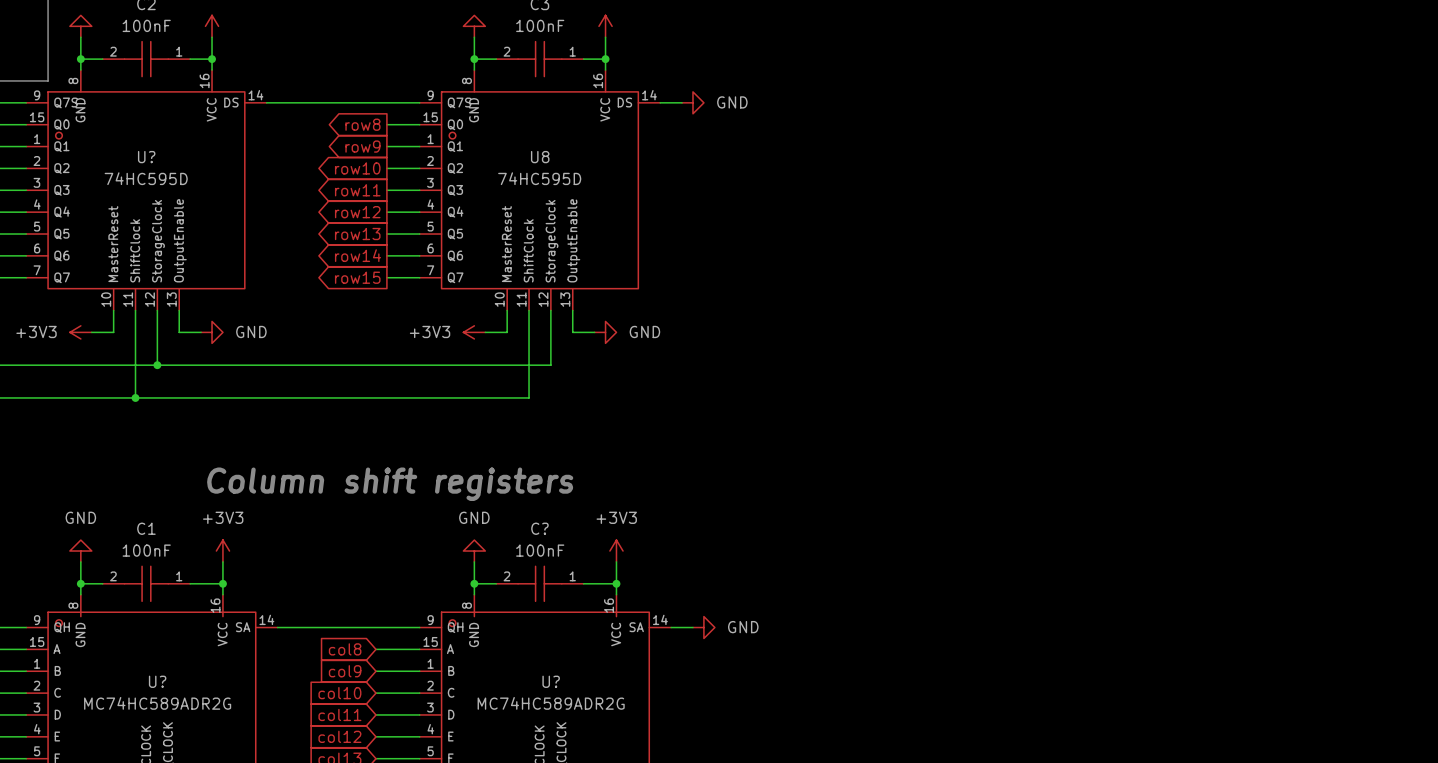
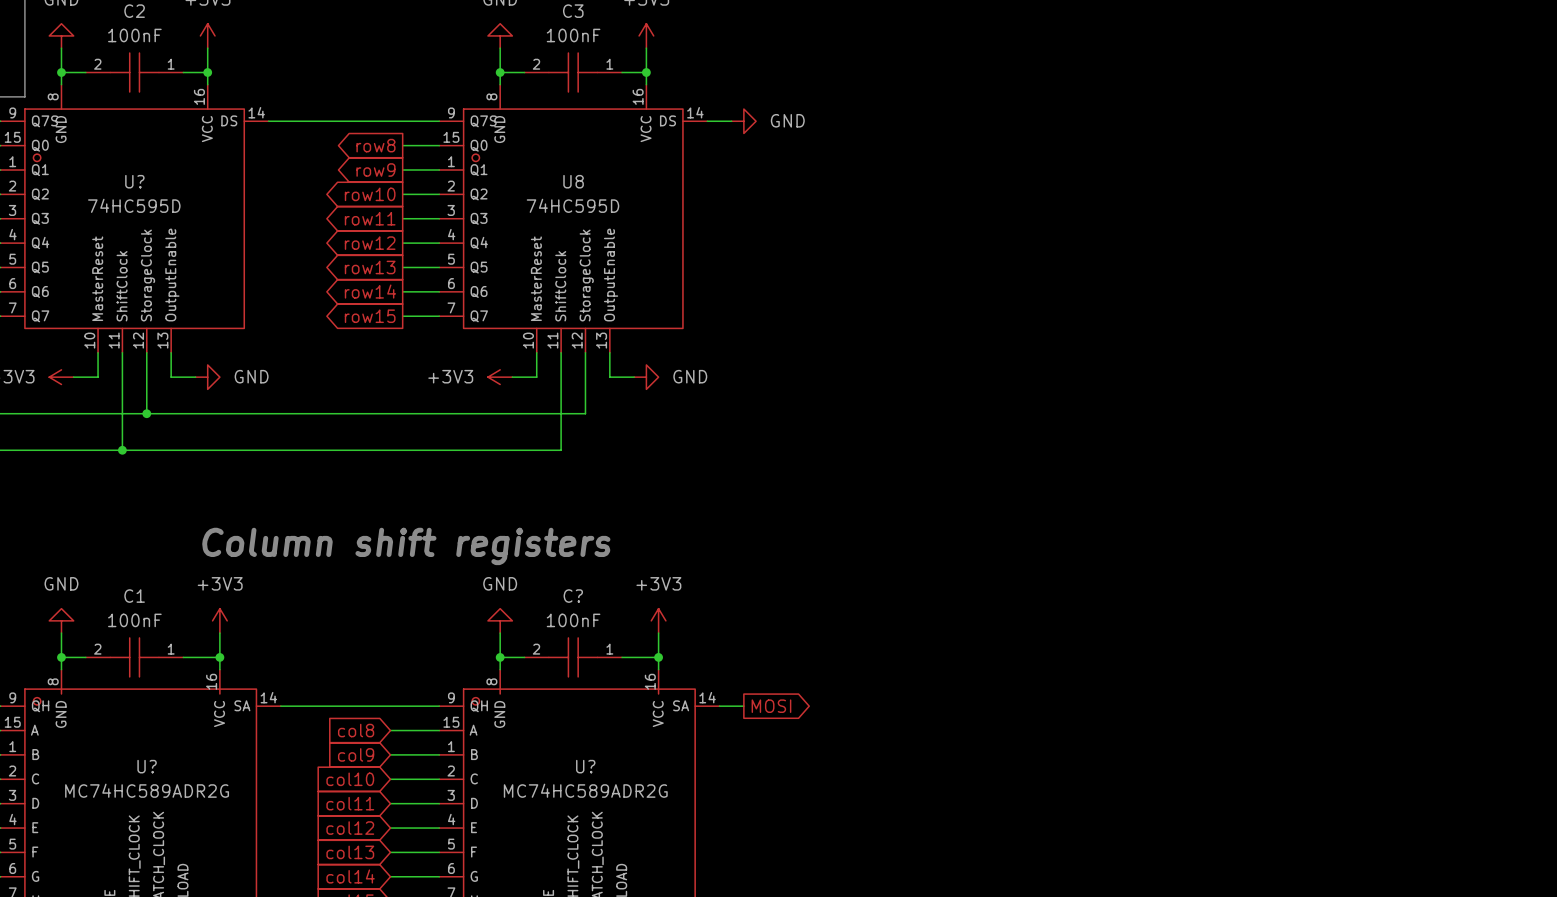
power symbol: GND (703, 627) -> none
global label: none -> MOSI (771, 706)

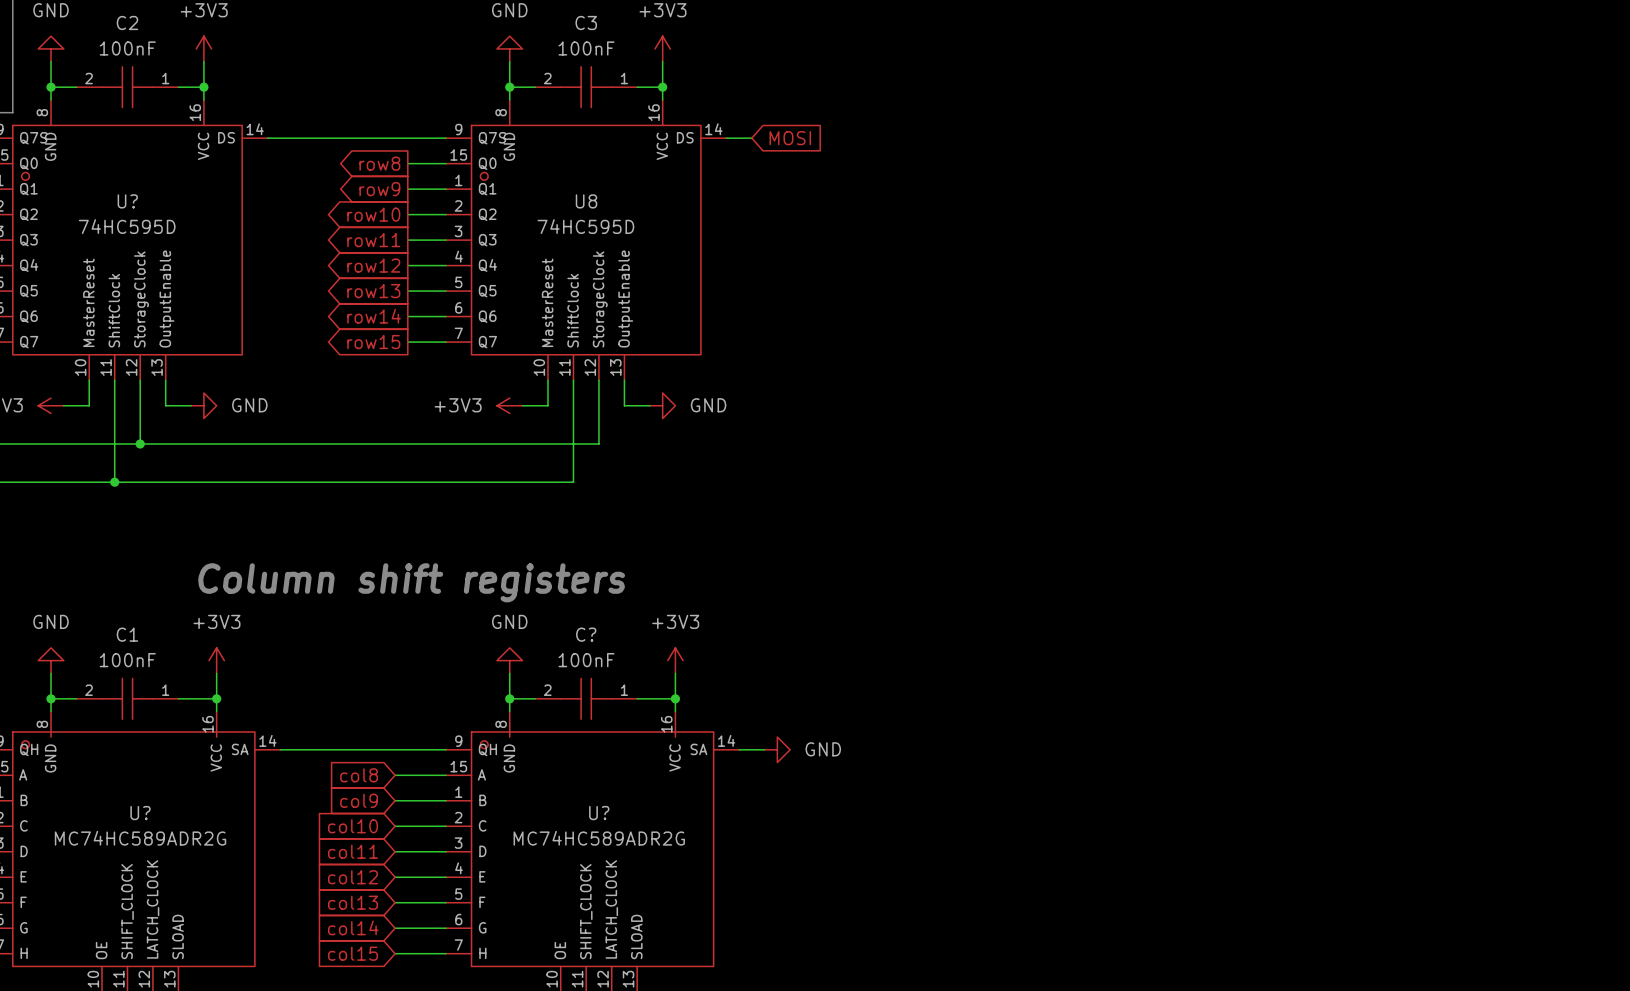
power symbol: GND (743, 121) -> none
global label: none -> MOSI (790, 138)
power symbol: none -> GND (777, 749)
global label: MOSI (771, 706) -> none

